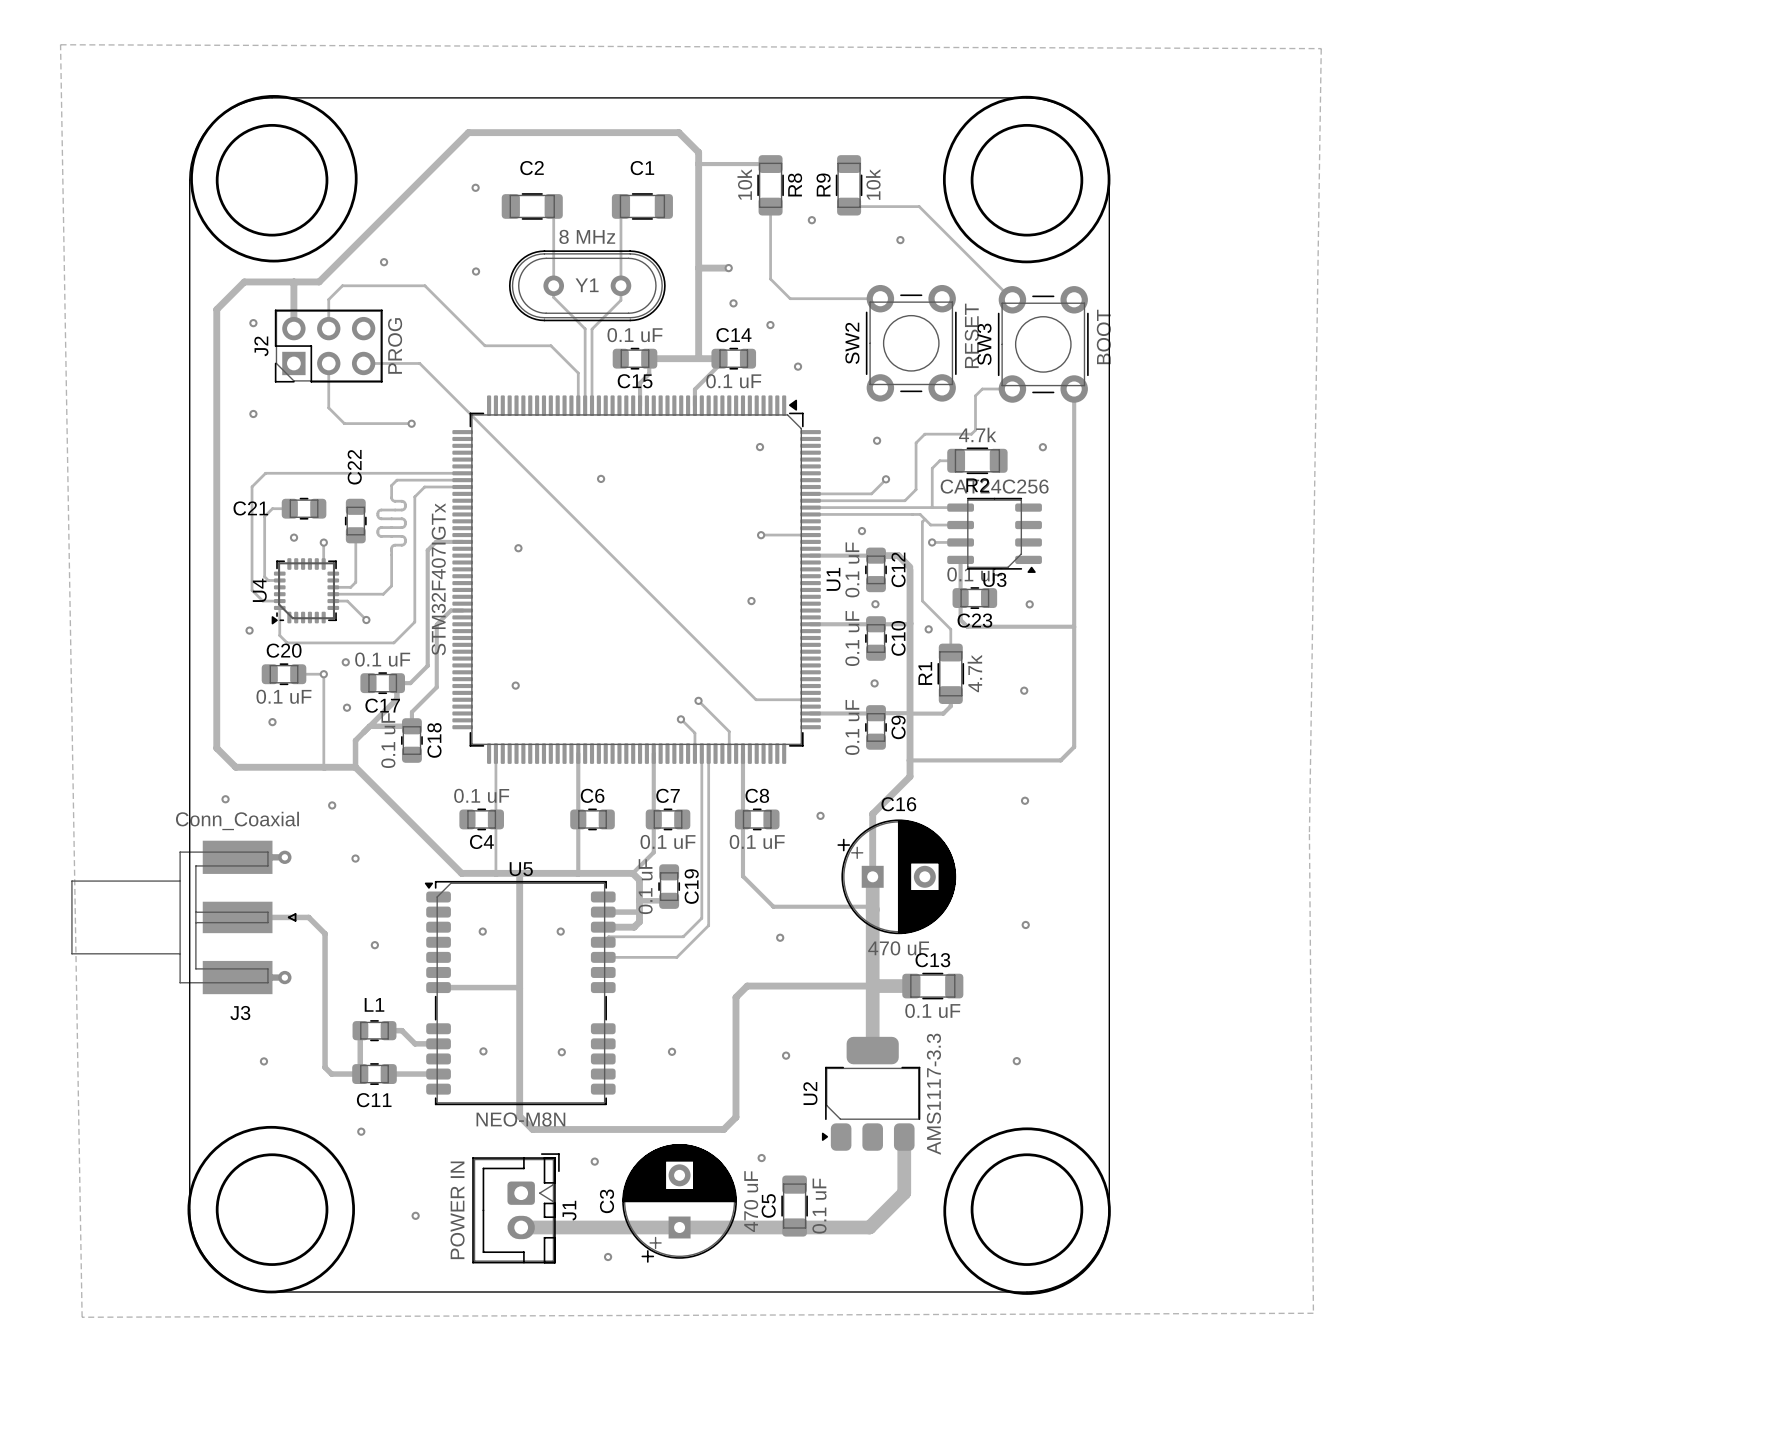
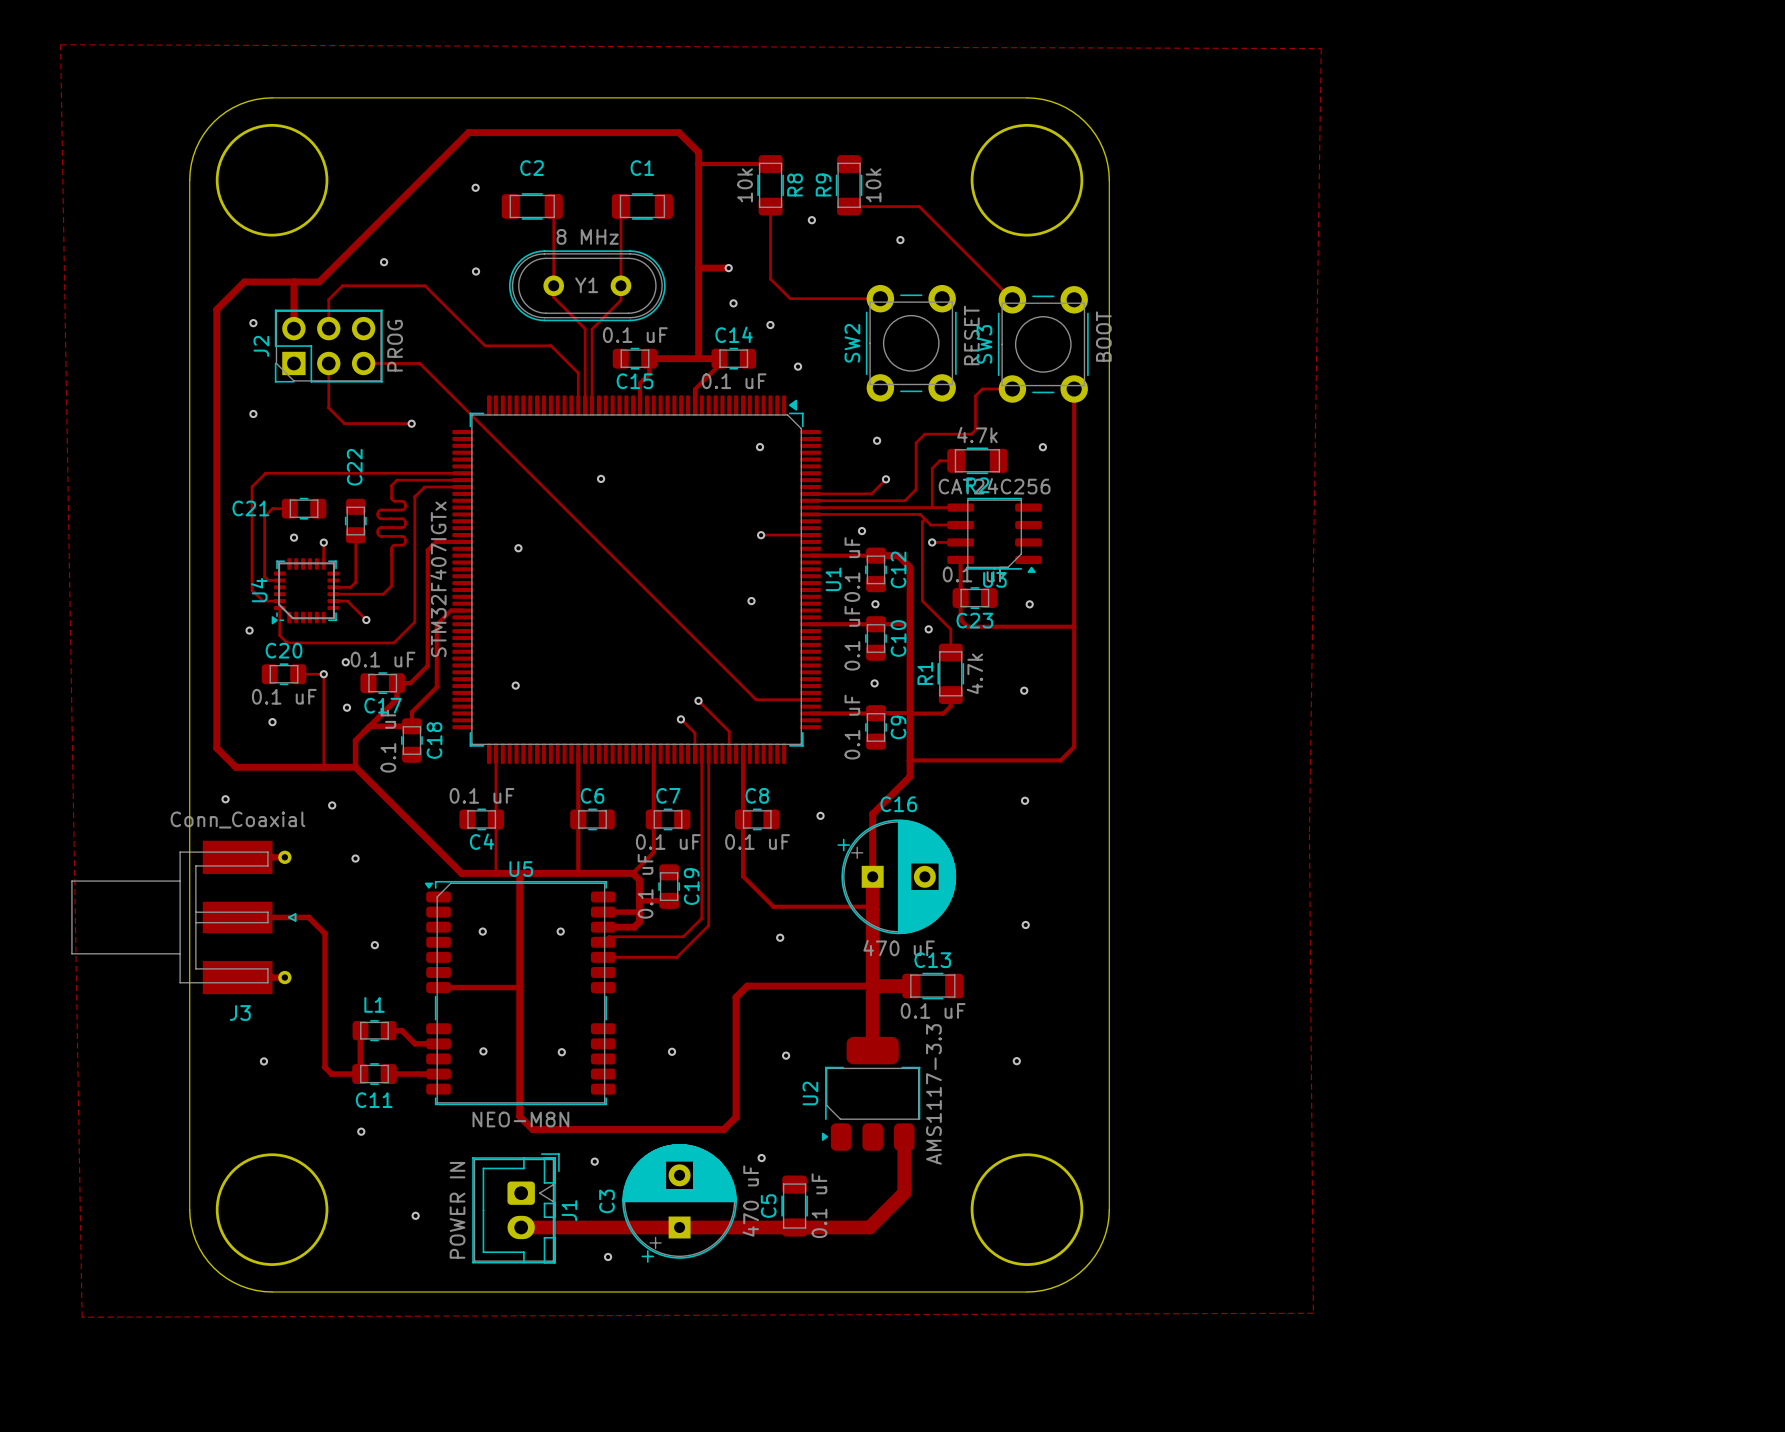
drawing: [190, 95, 358, 263] -> none
drawing: [942, 95, 1111, 264] -> none
drawing: [187, 1125, 355, 1294] -> none
drawing: [943, 1127, 1111, 1295] -> none

